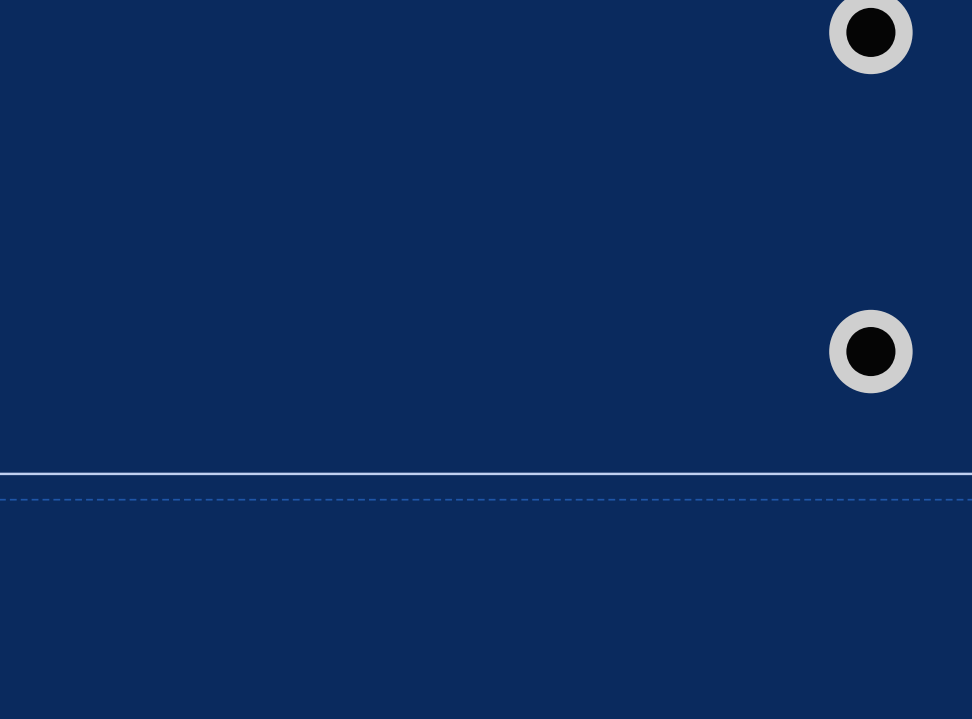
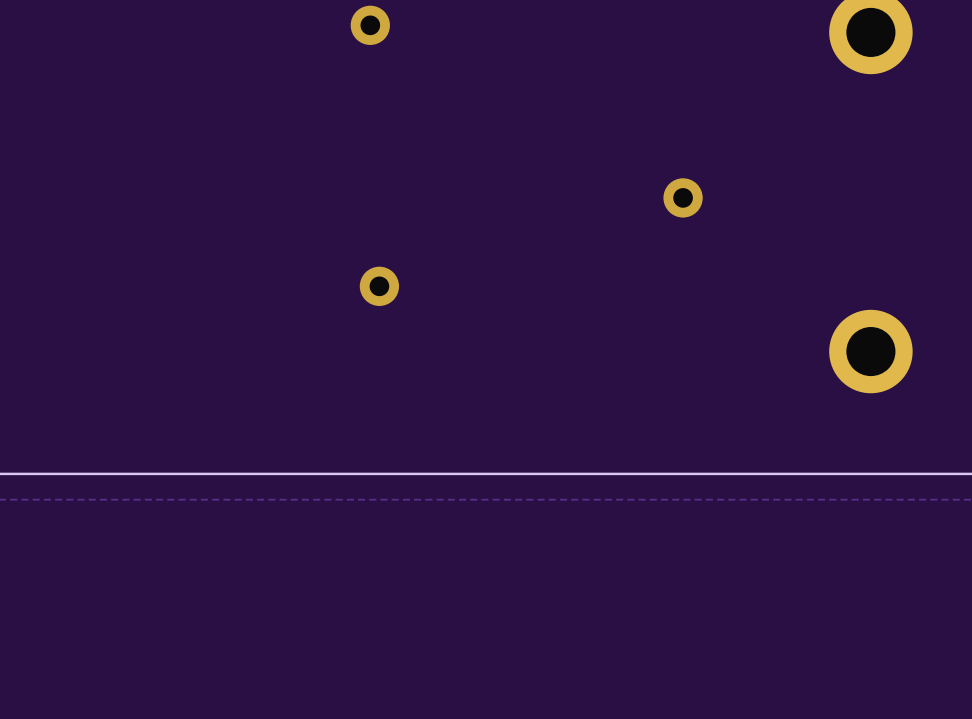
via: none -> (370, 25)
via: none -> (683, 197)
via: none -> (379, 286)

